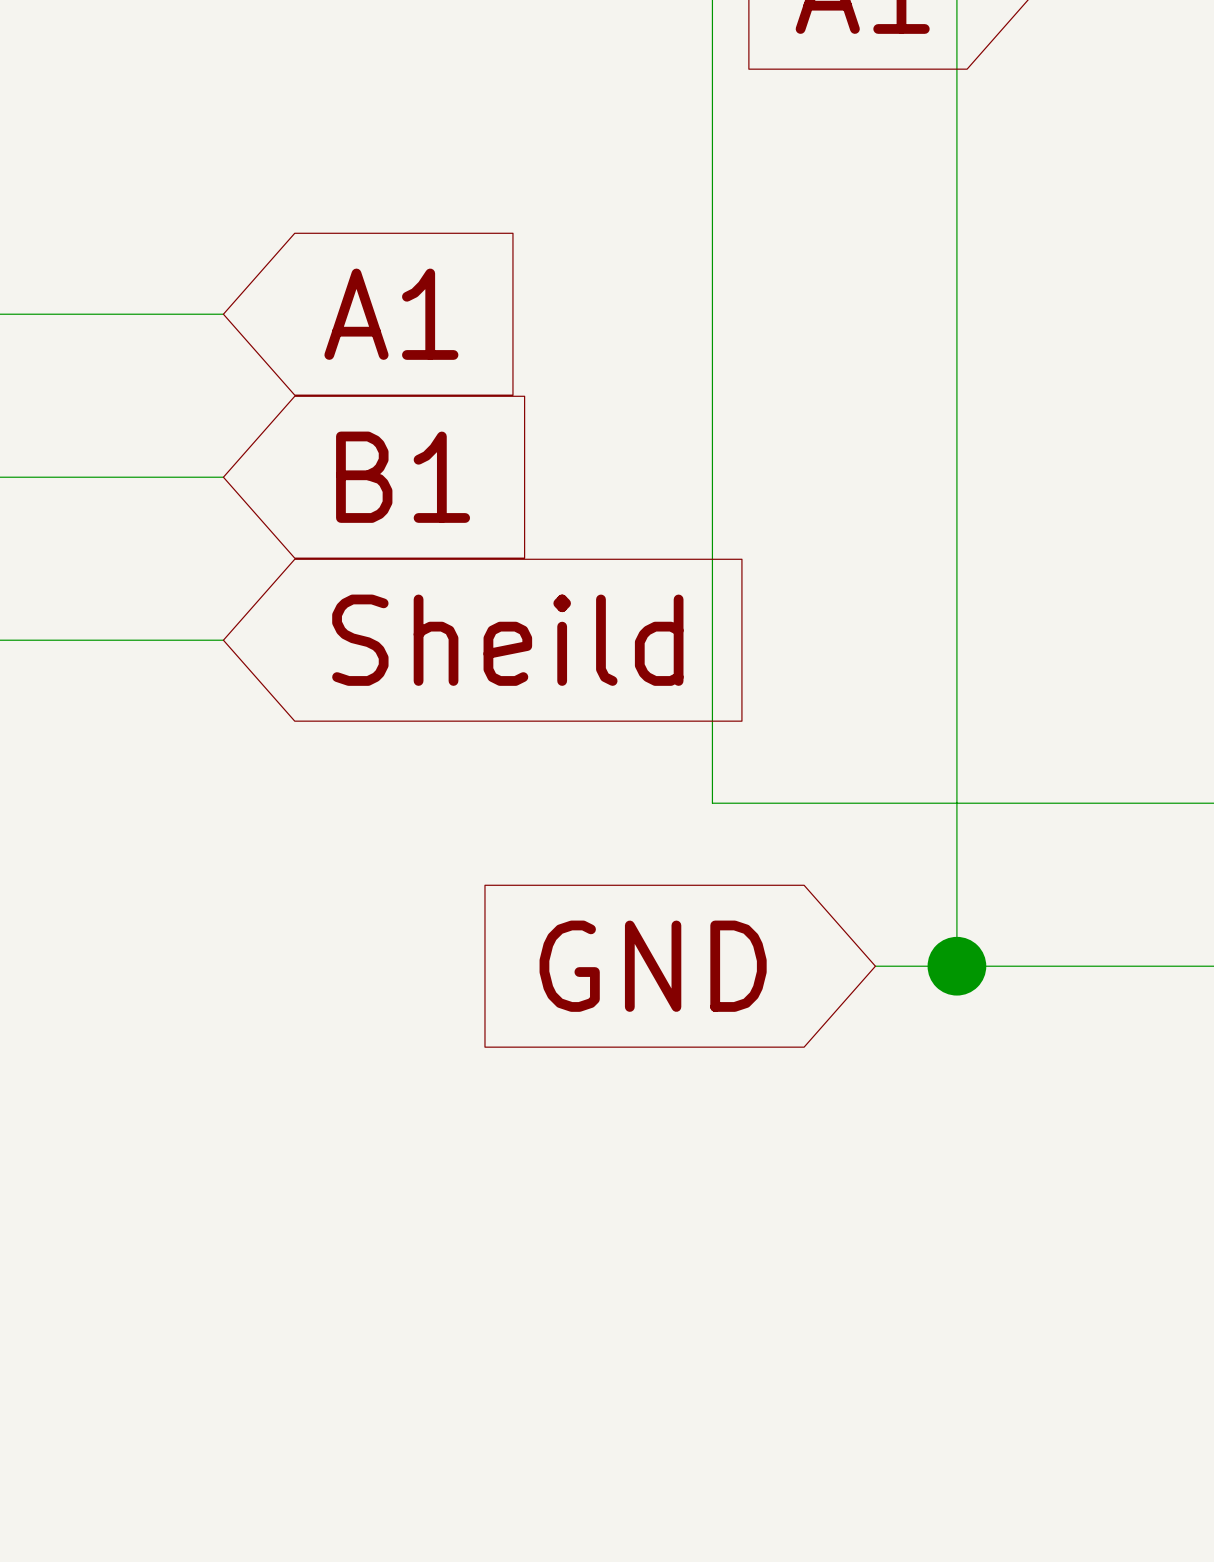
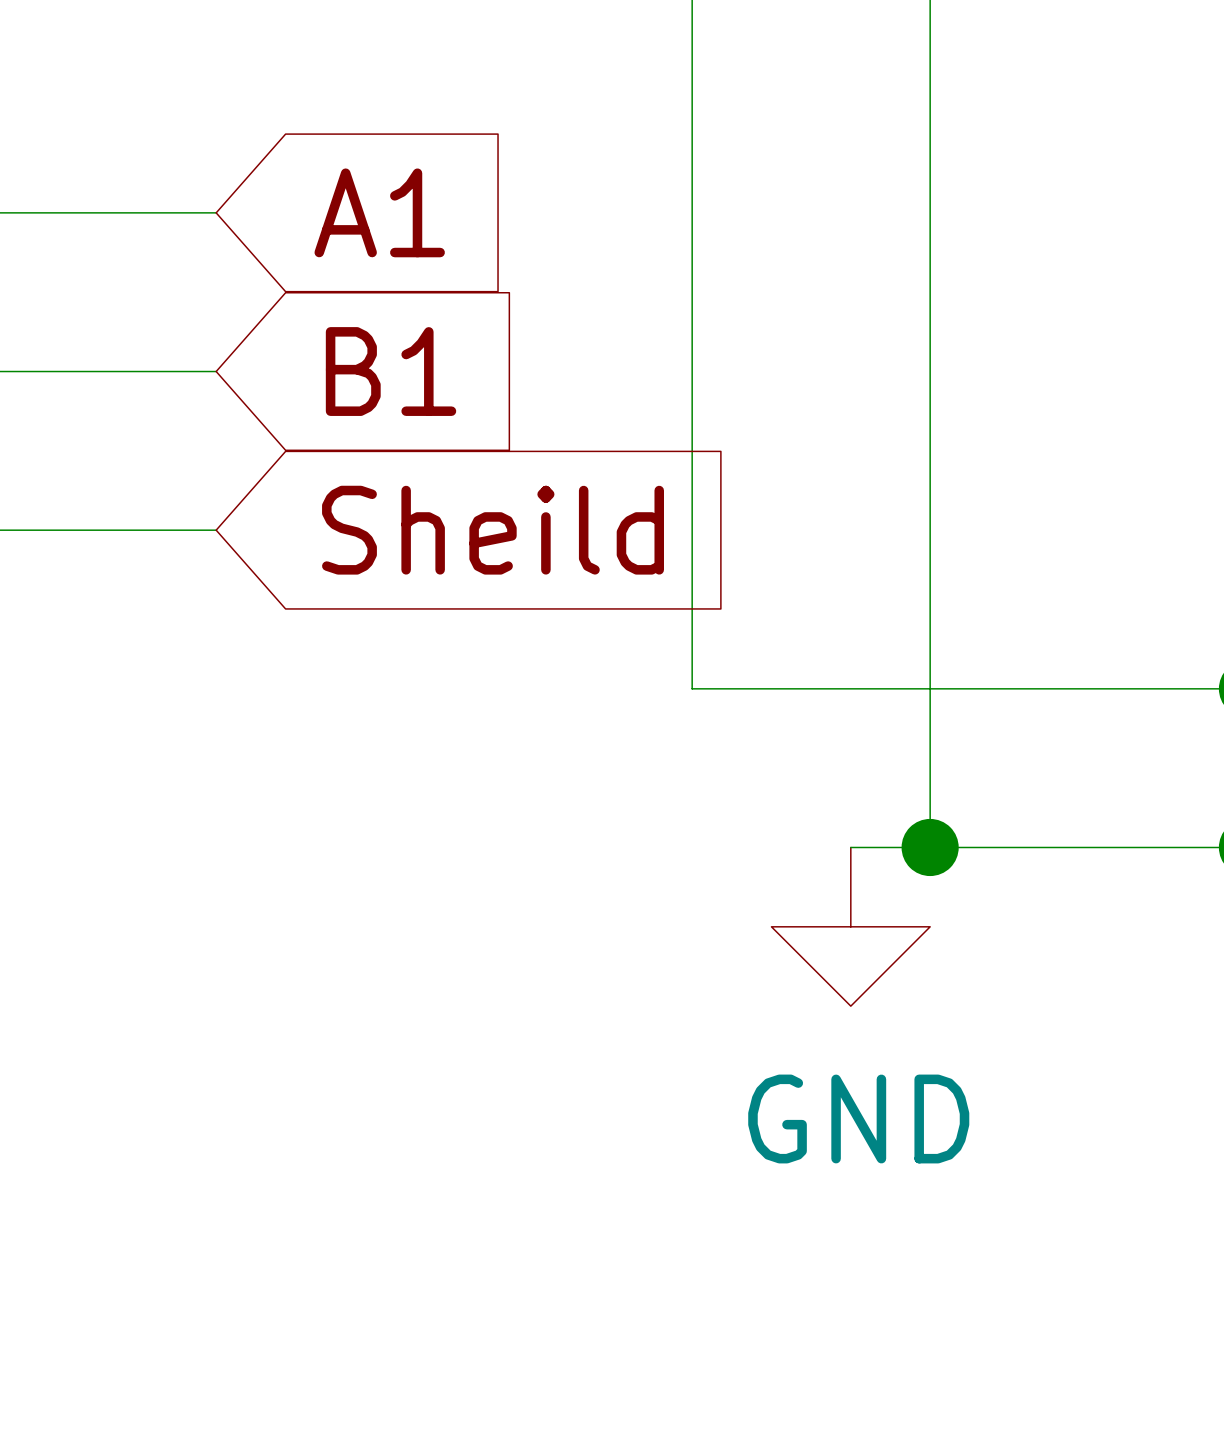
global label: GND (653, 966) -> none
power symbol: none -> GND (850, 926)

